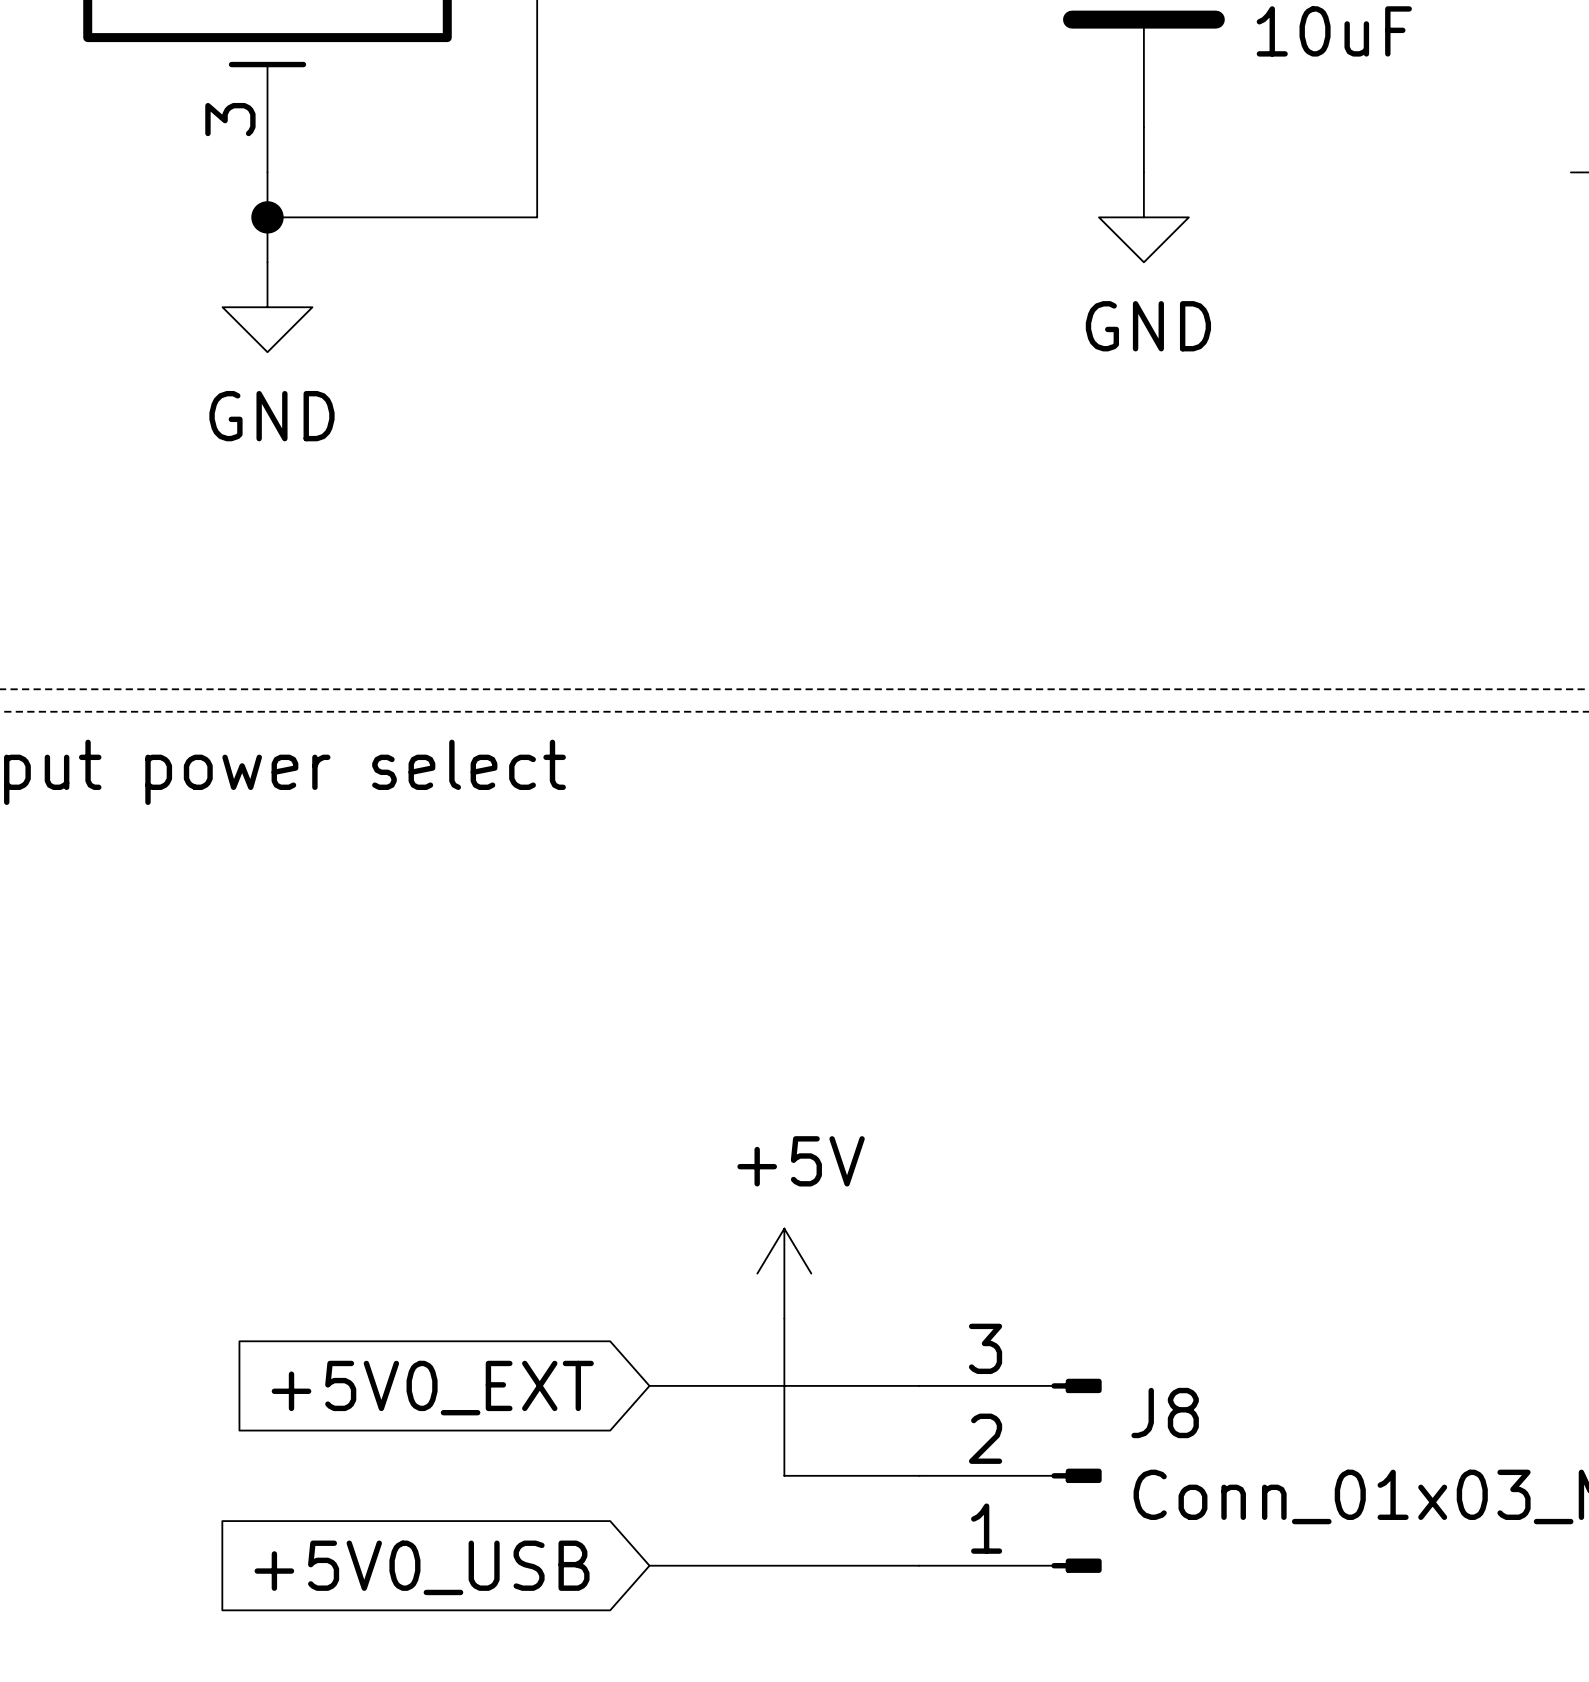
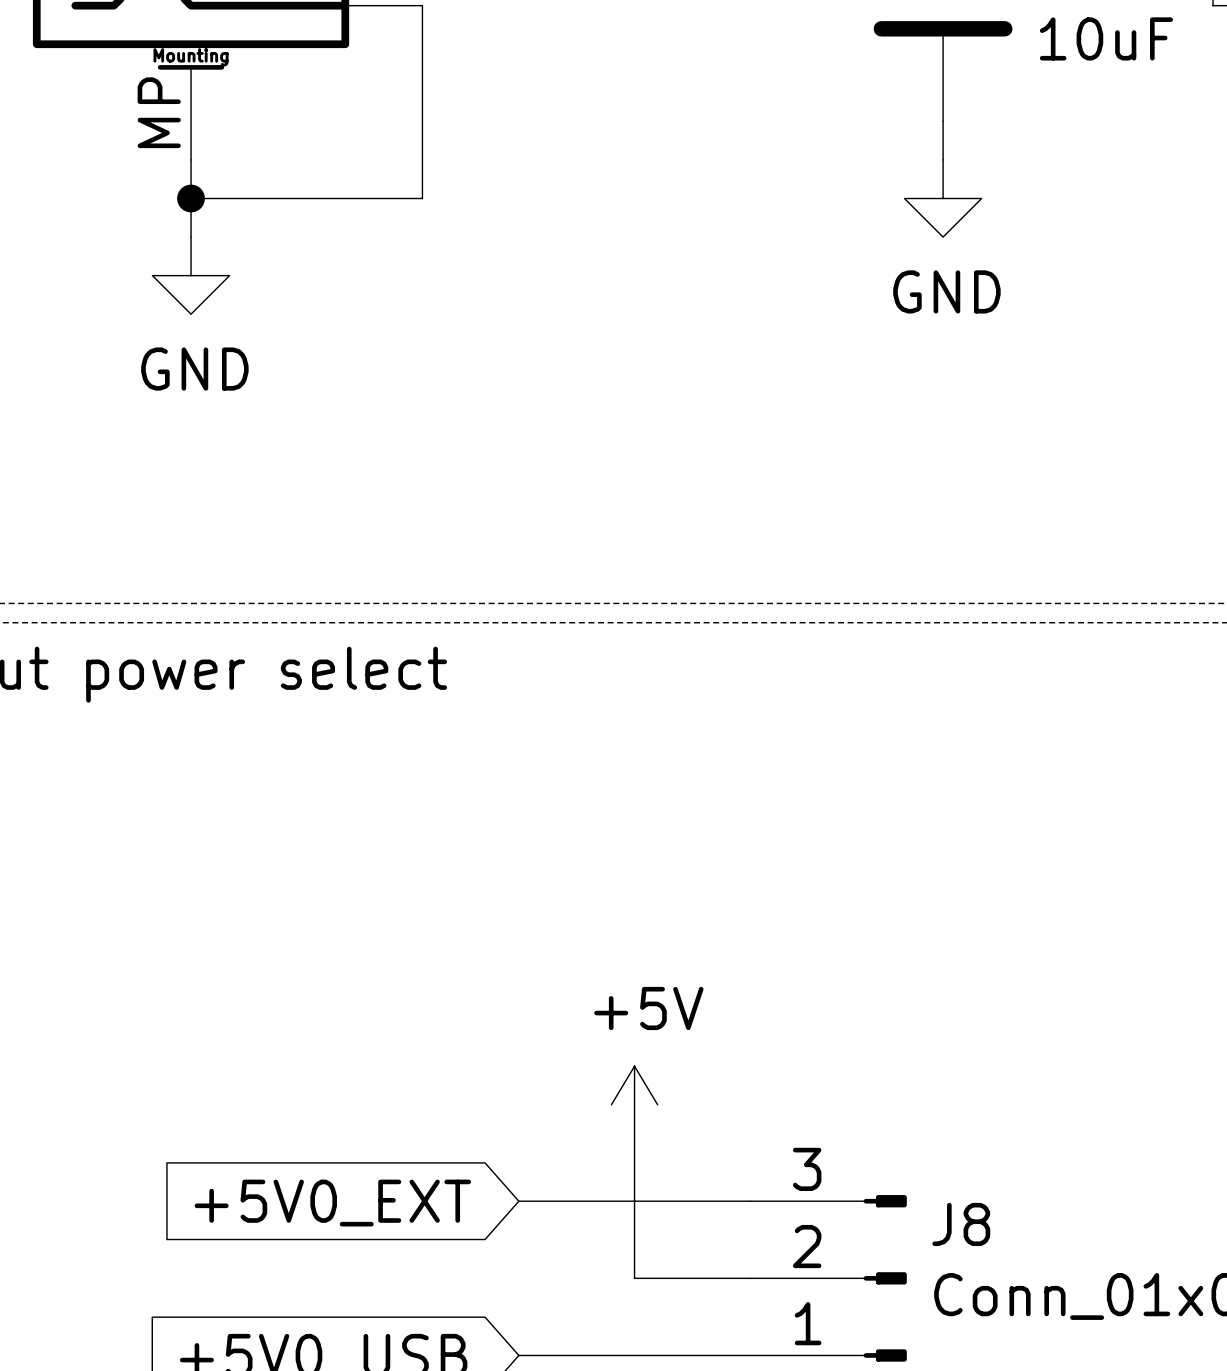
part text: none -> Mounting (191, 57)
part pin number: 3 (230, 119) -> MP (159, 112)

